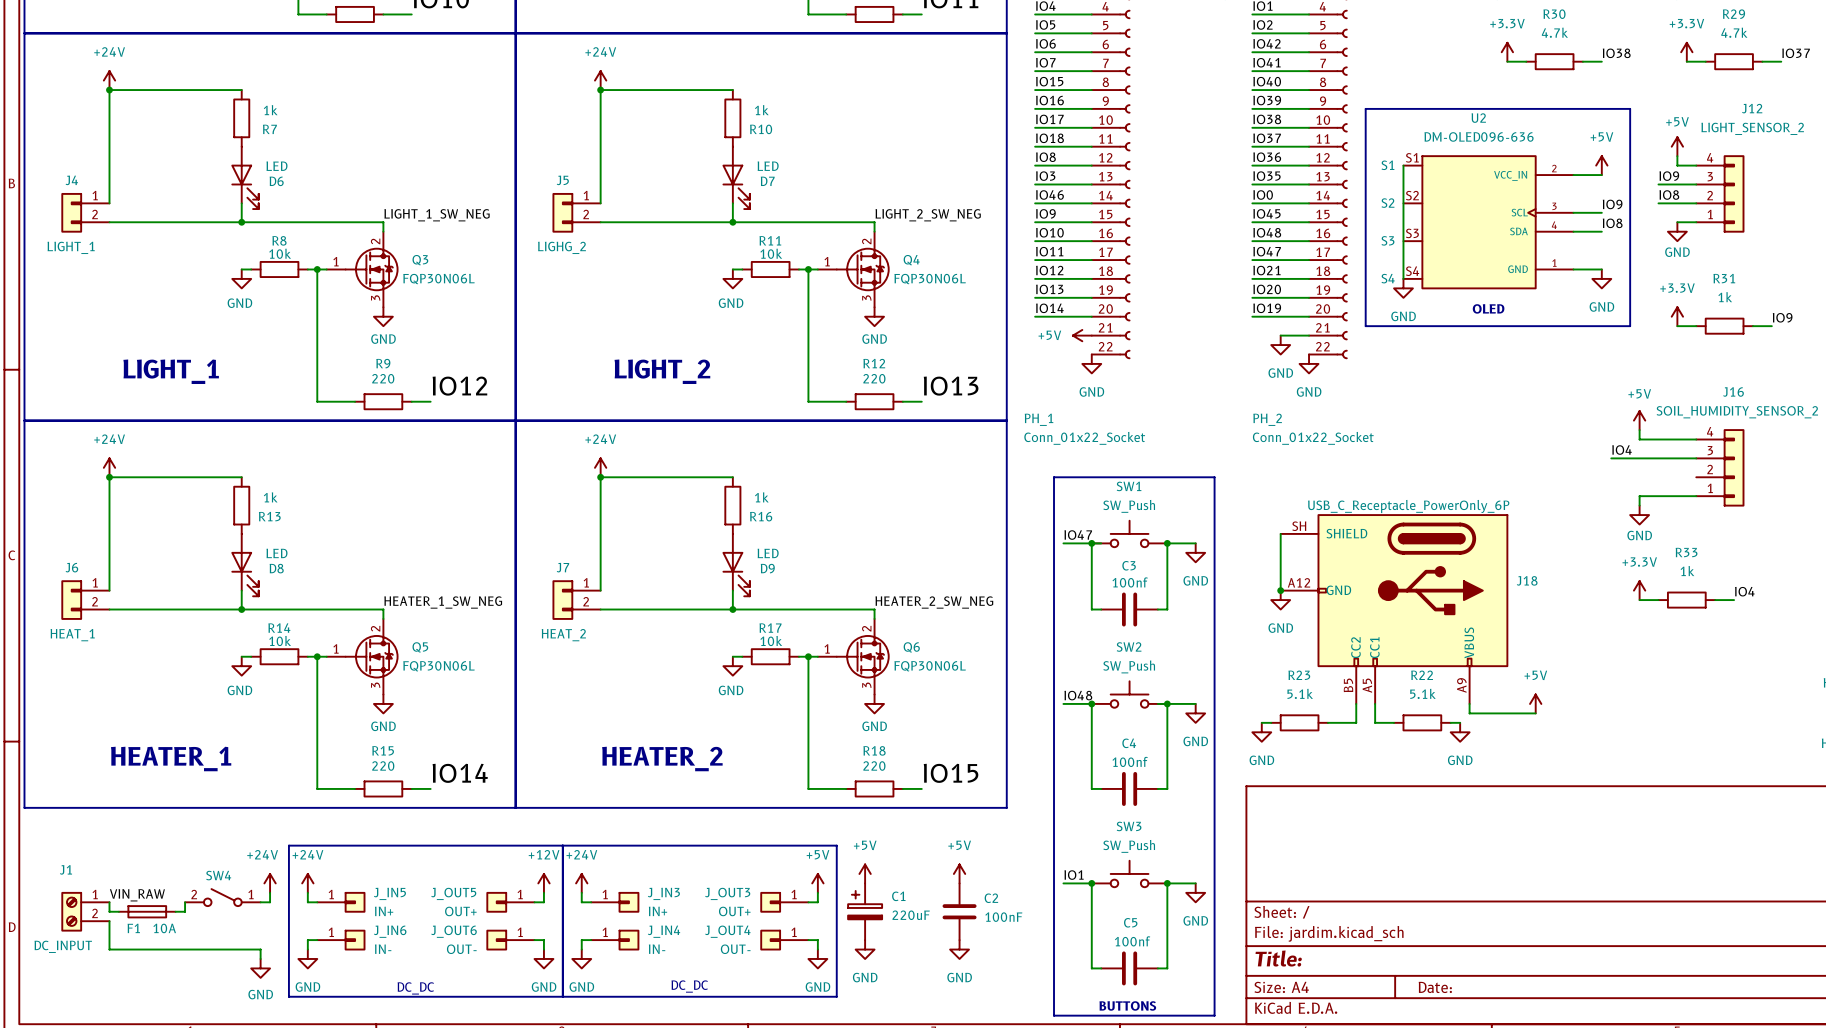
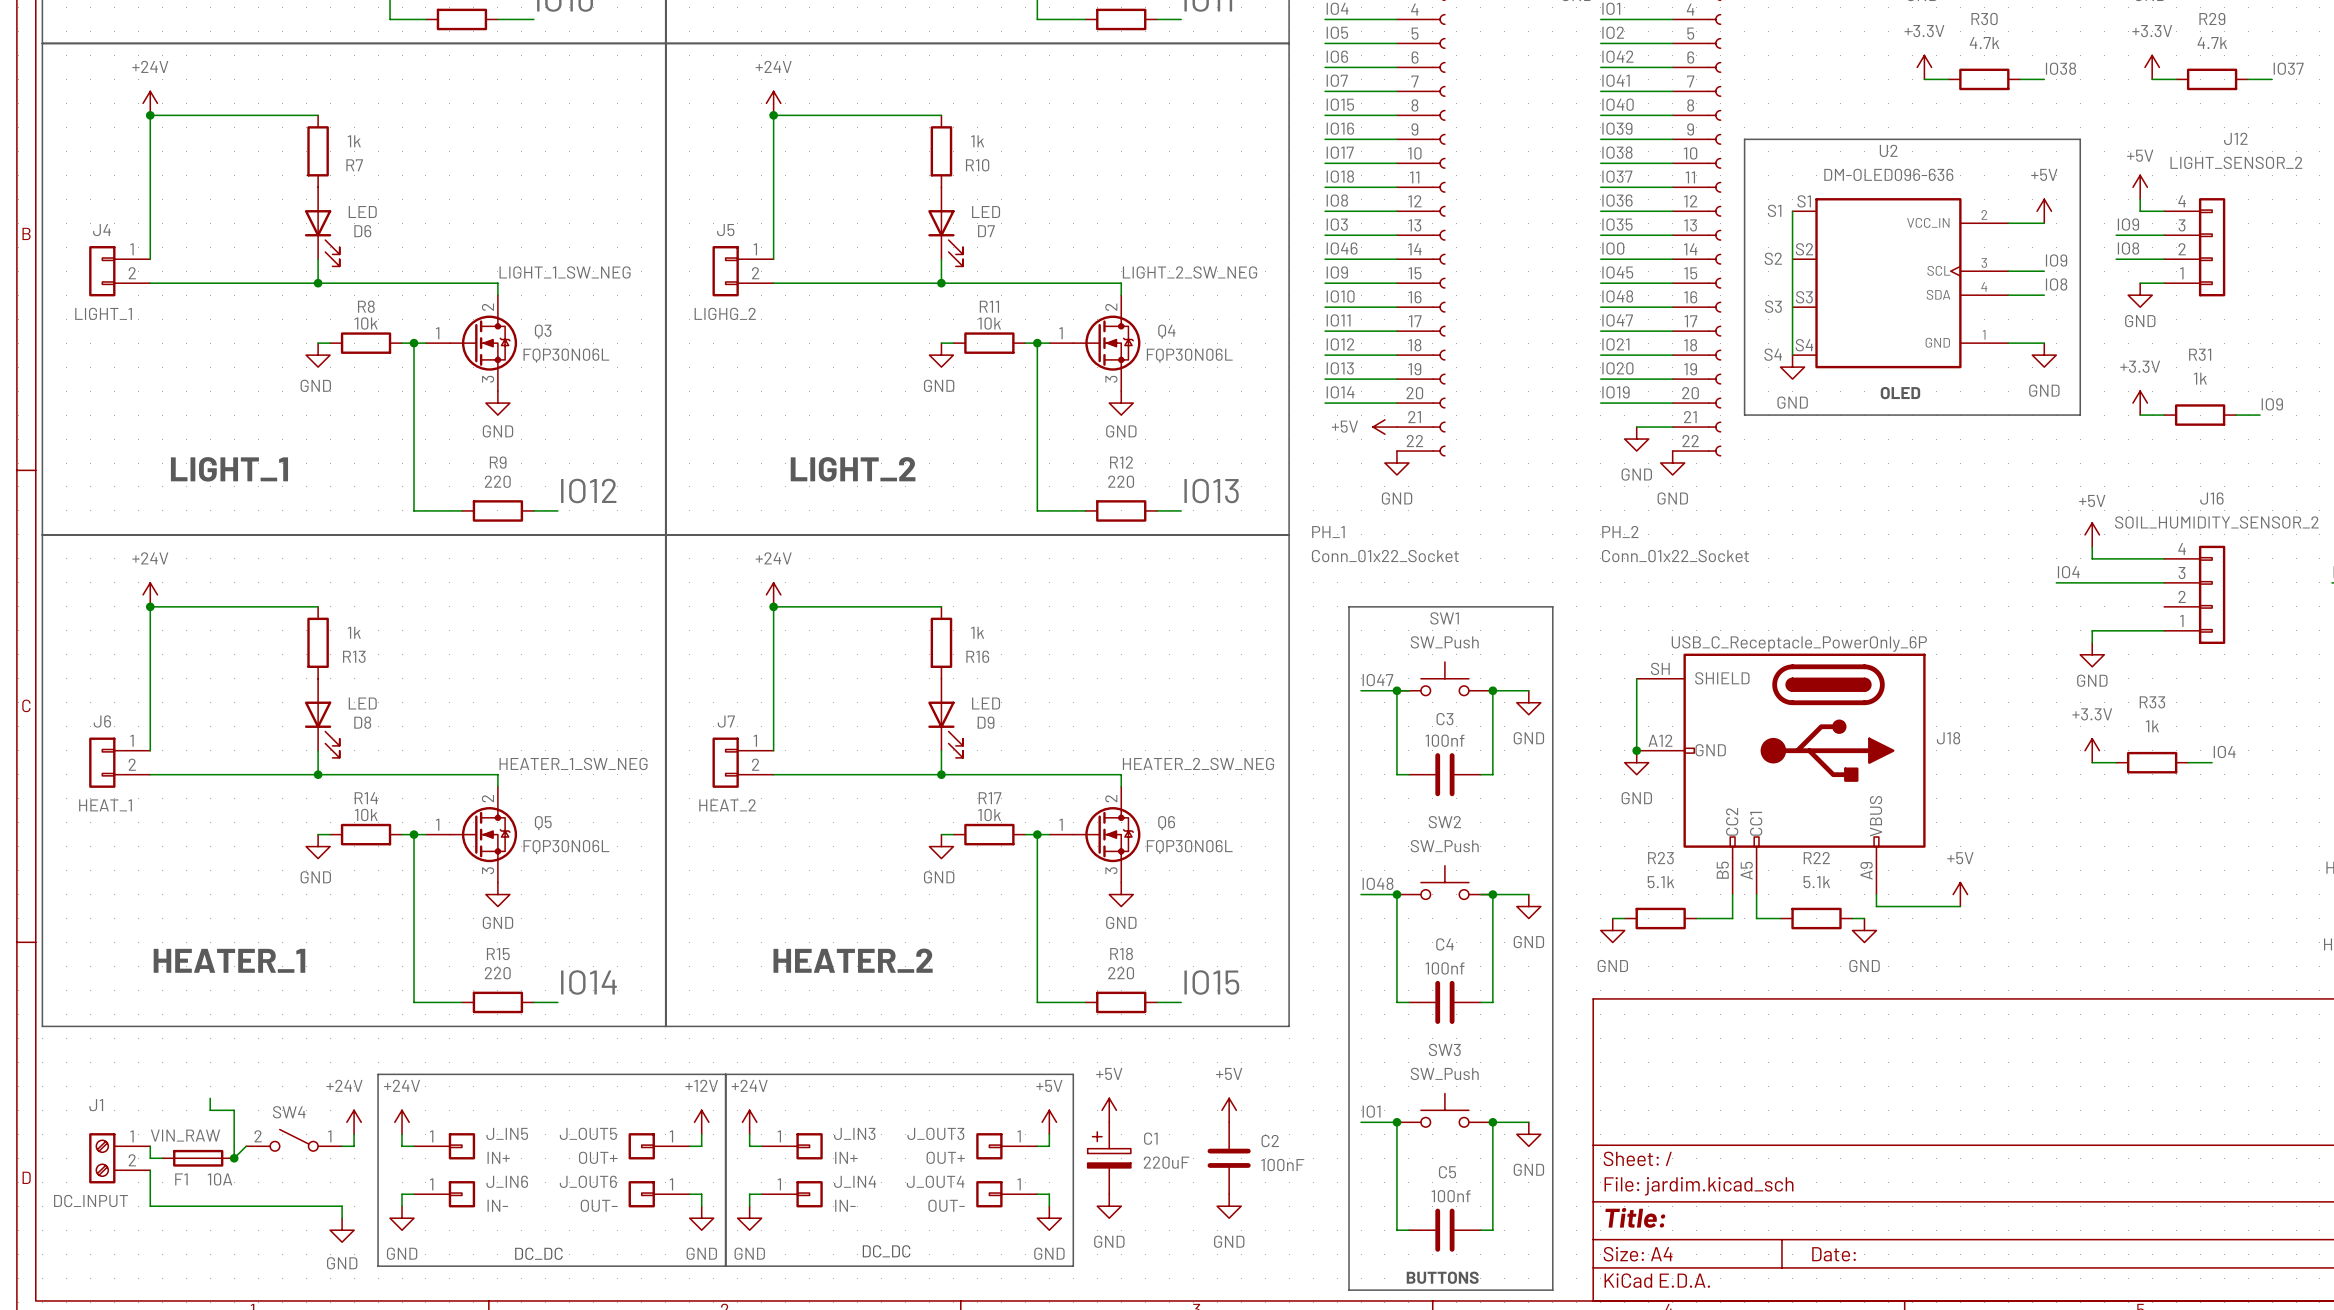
wire: (185, 902) (185, 911) (175, 911) -> (246, 1146) (234, 1158) (234, 1110) (210, 1110) (210, 1098)
junction: none -> (234, 1158)

